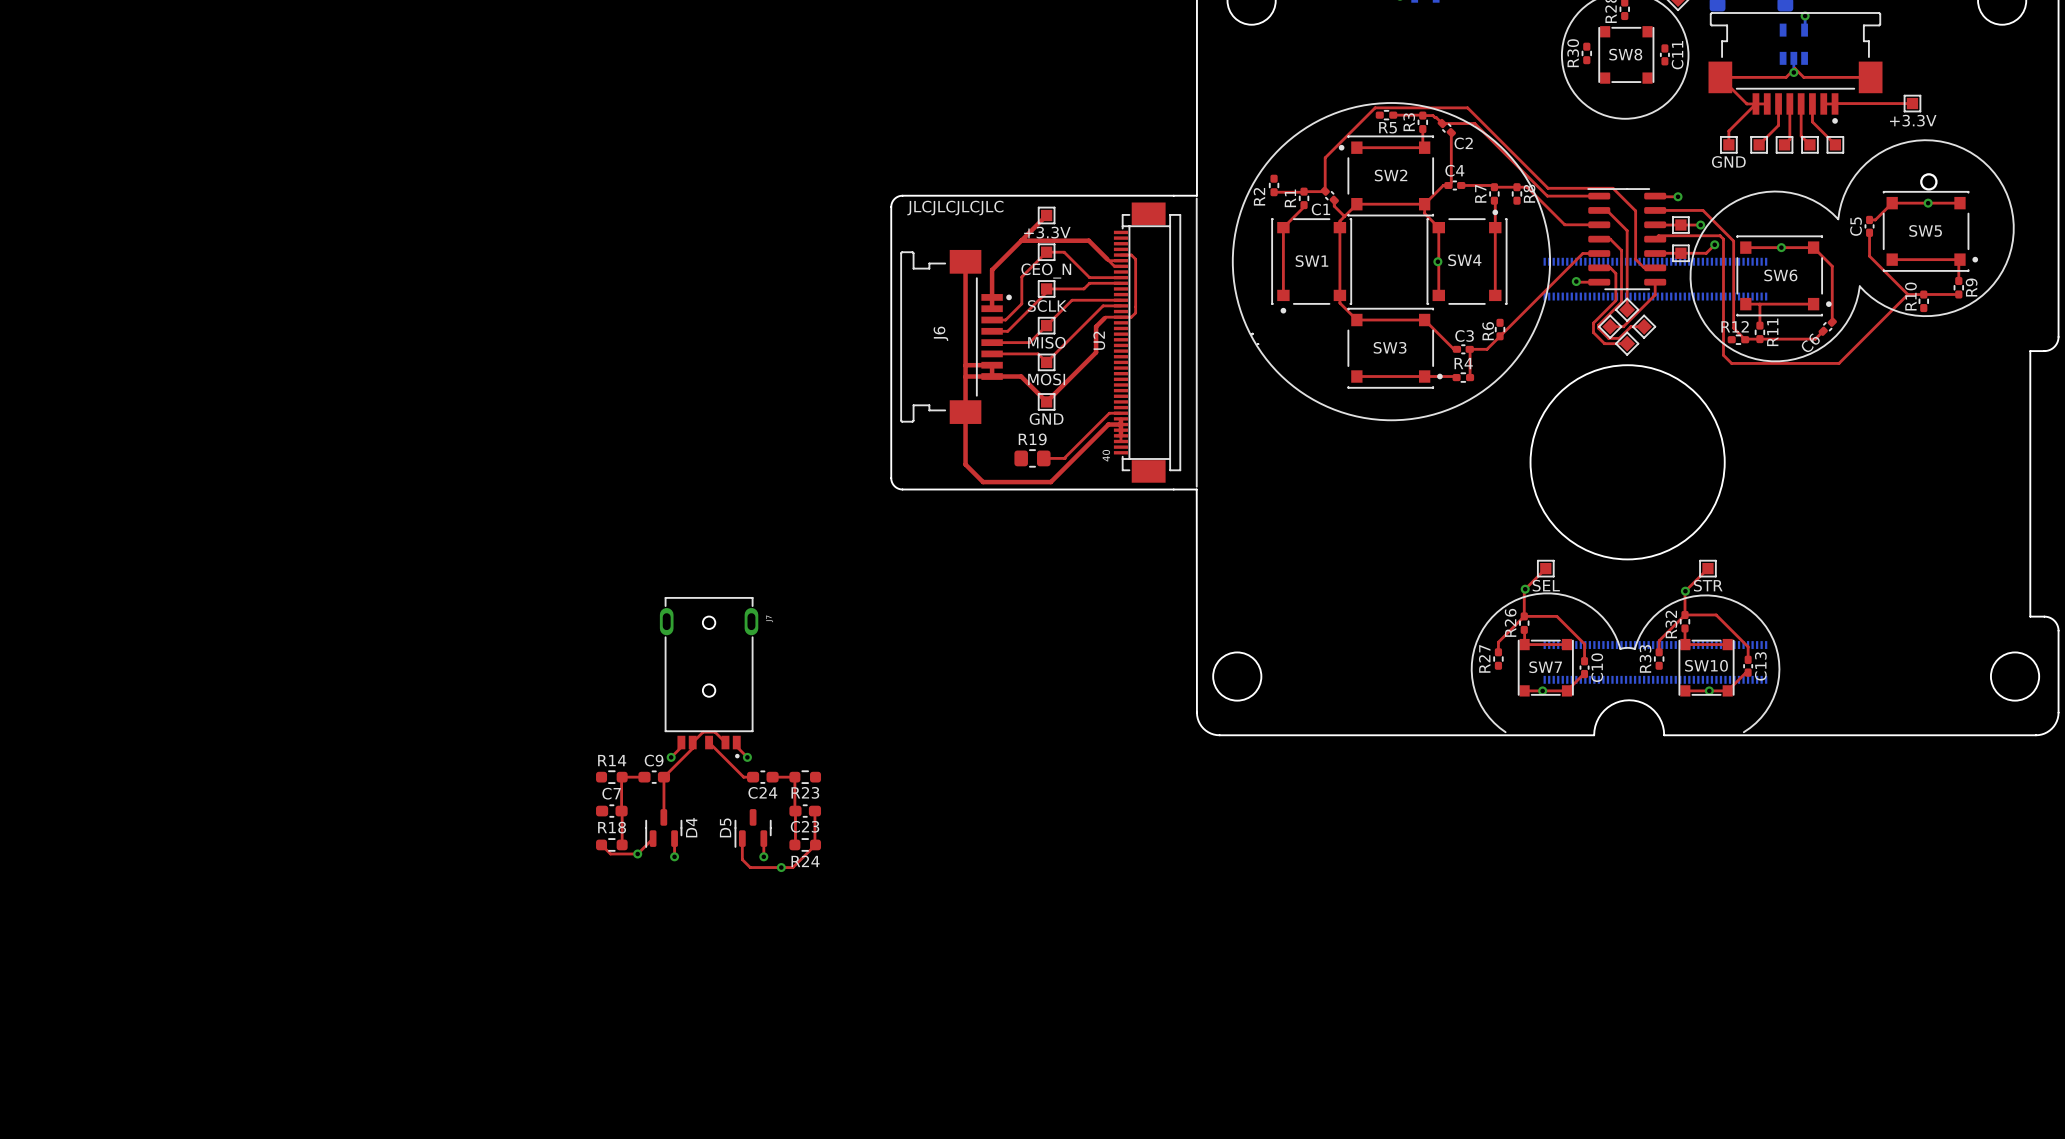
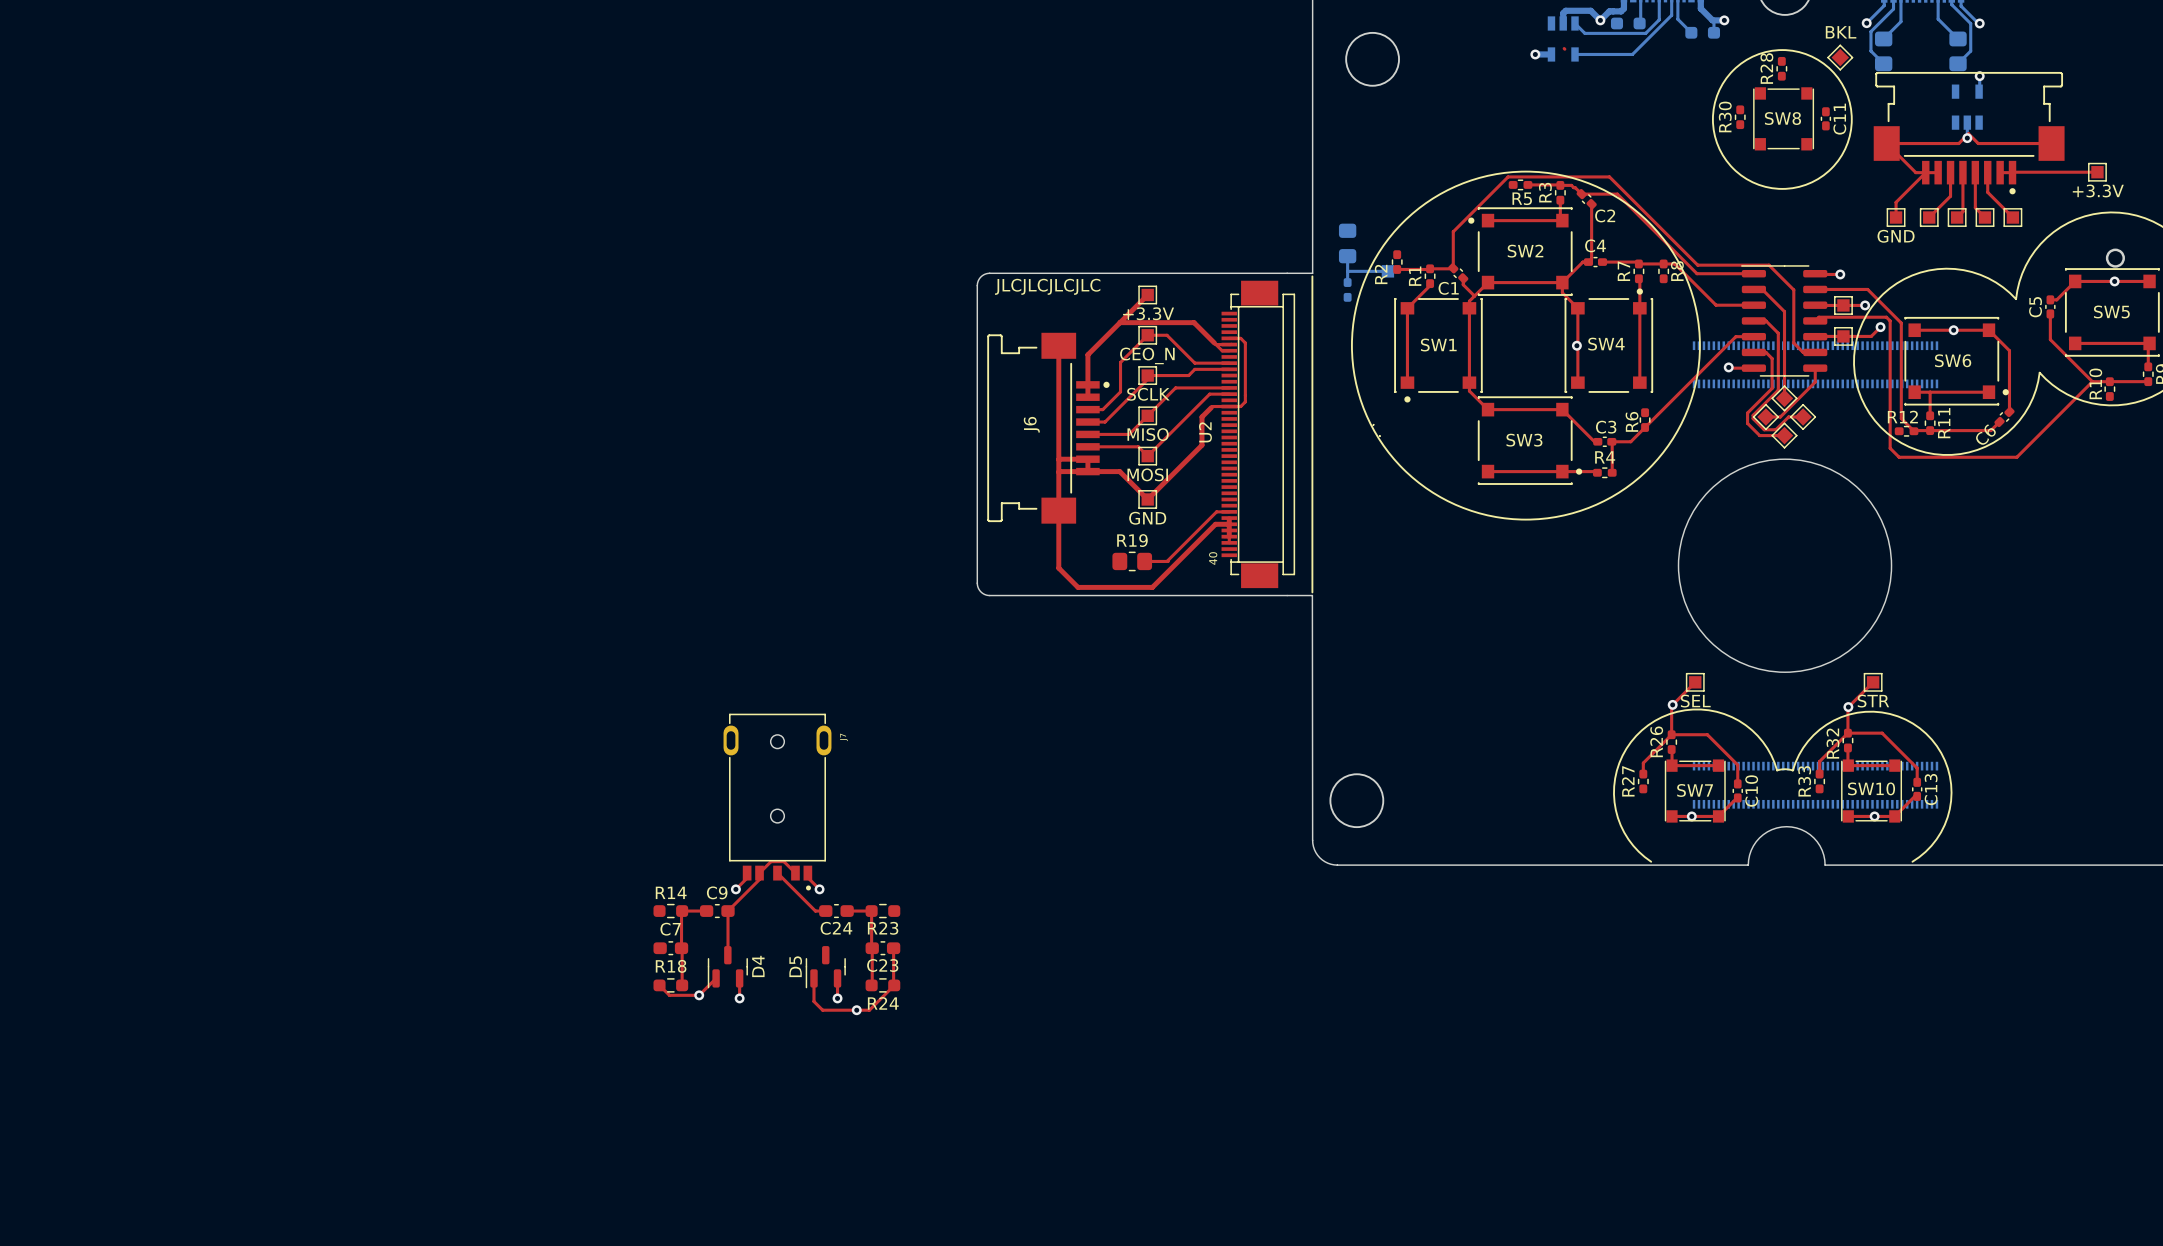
part: none -> (1347, 243)
bottom track: none -> (1347, 256) (1347, 282)
bottom track: none -> (1347, 271) (1387, 271)
part: none -> (1387, 271)
part: none -> (1347, 289)

